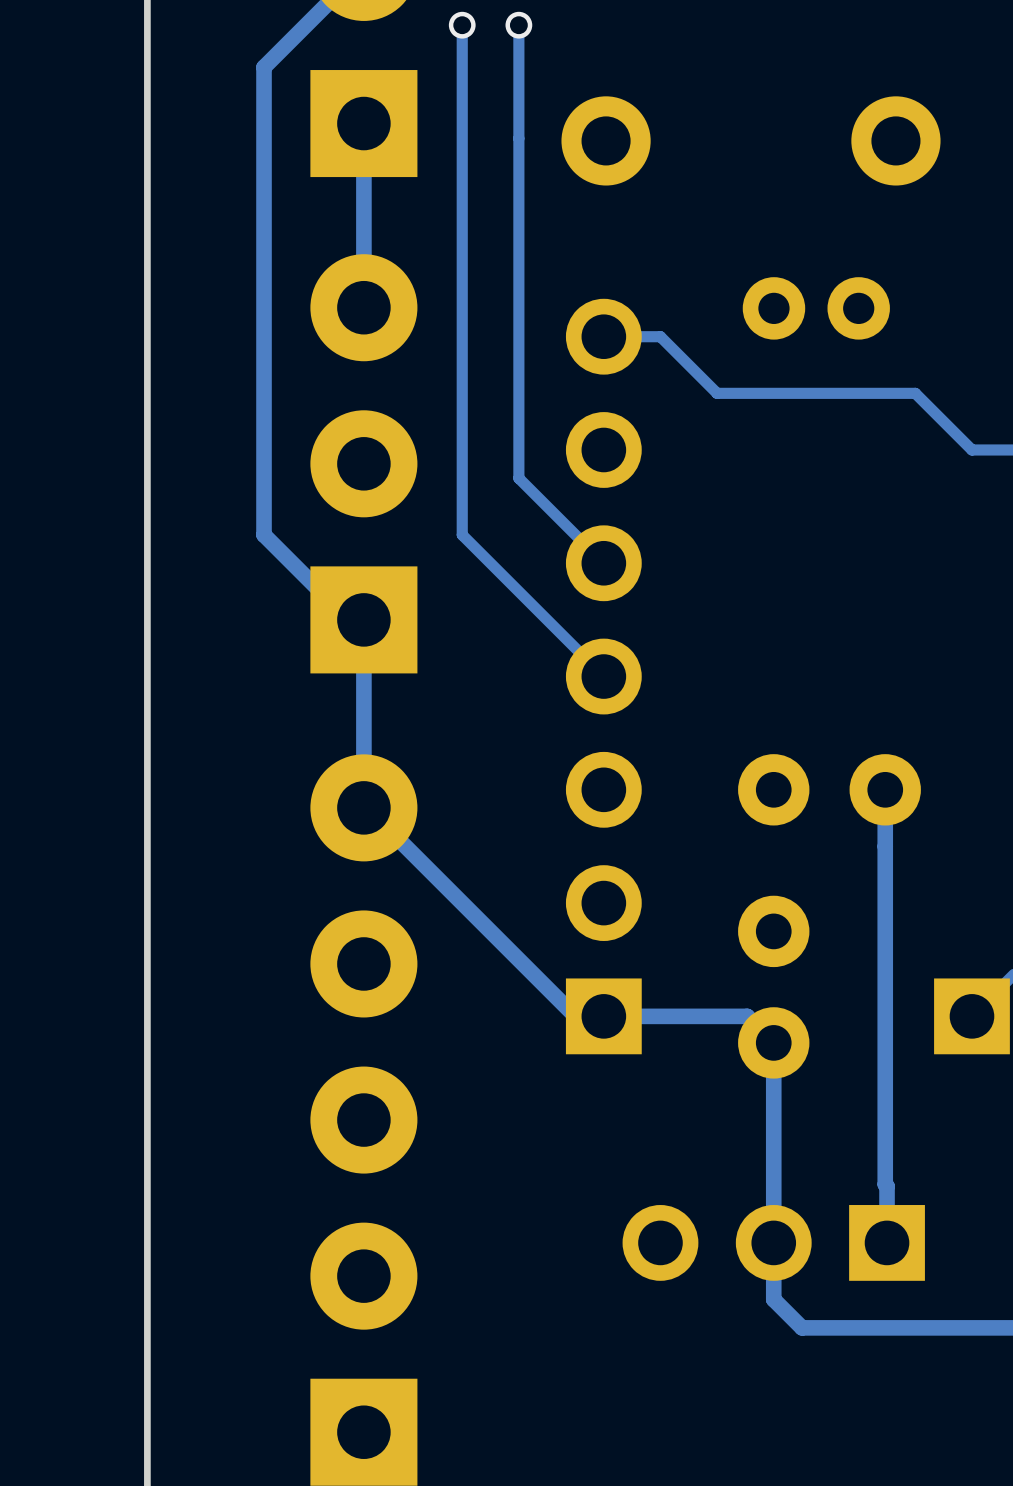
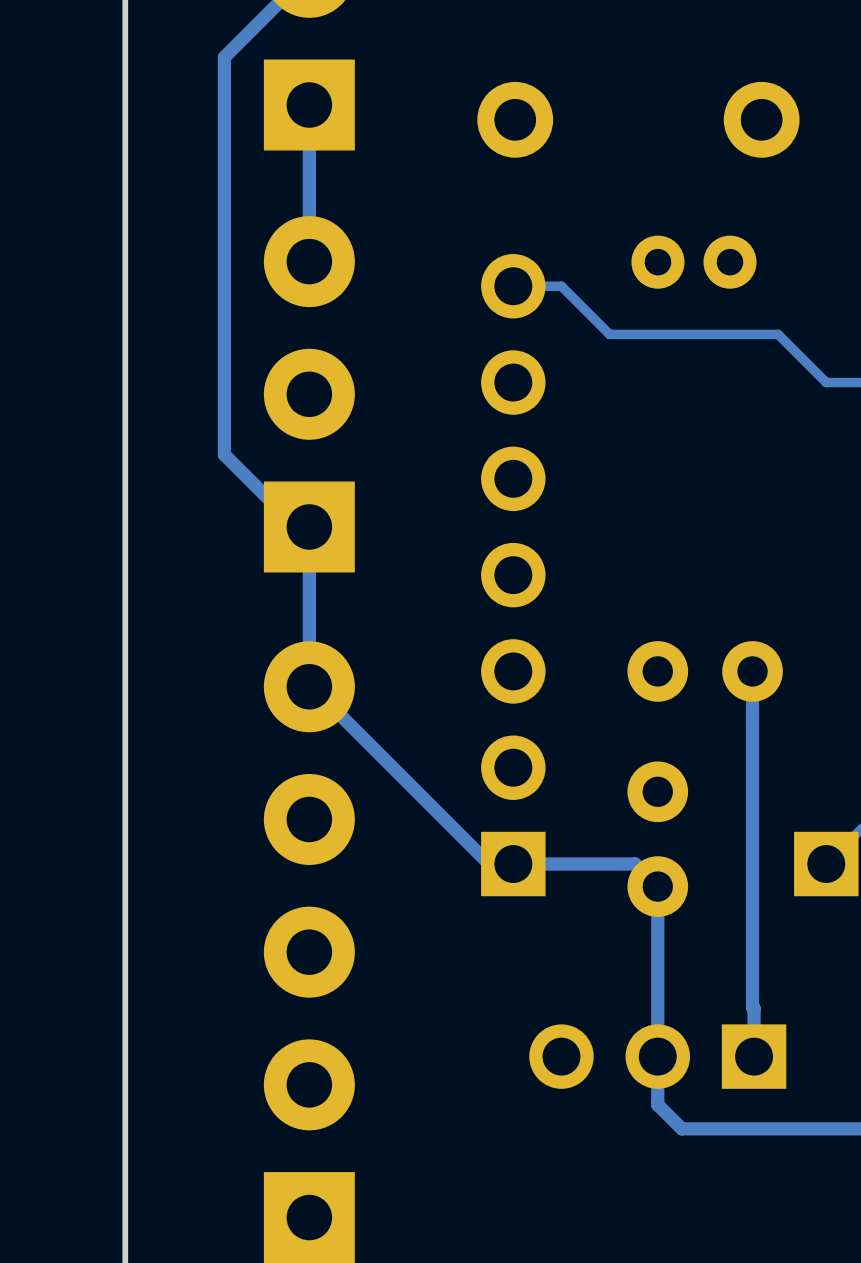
track: (462, 25) (462, 534) (603, 676) -> none
via: (462, 25) -> none
track: (518, 25) (518, 478) (603, 563) -> none
via: (518, 25) -> none

